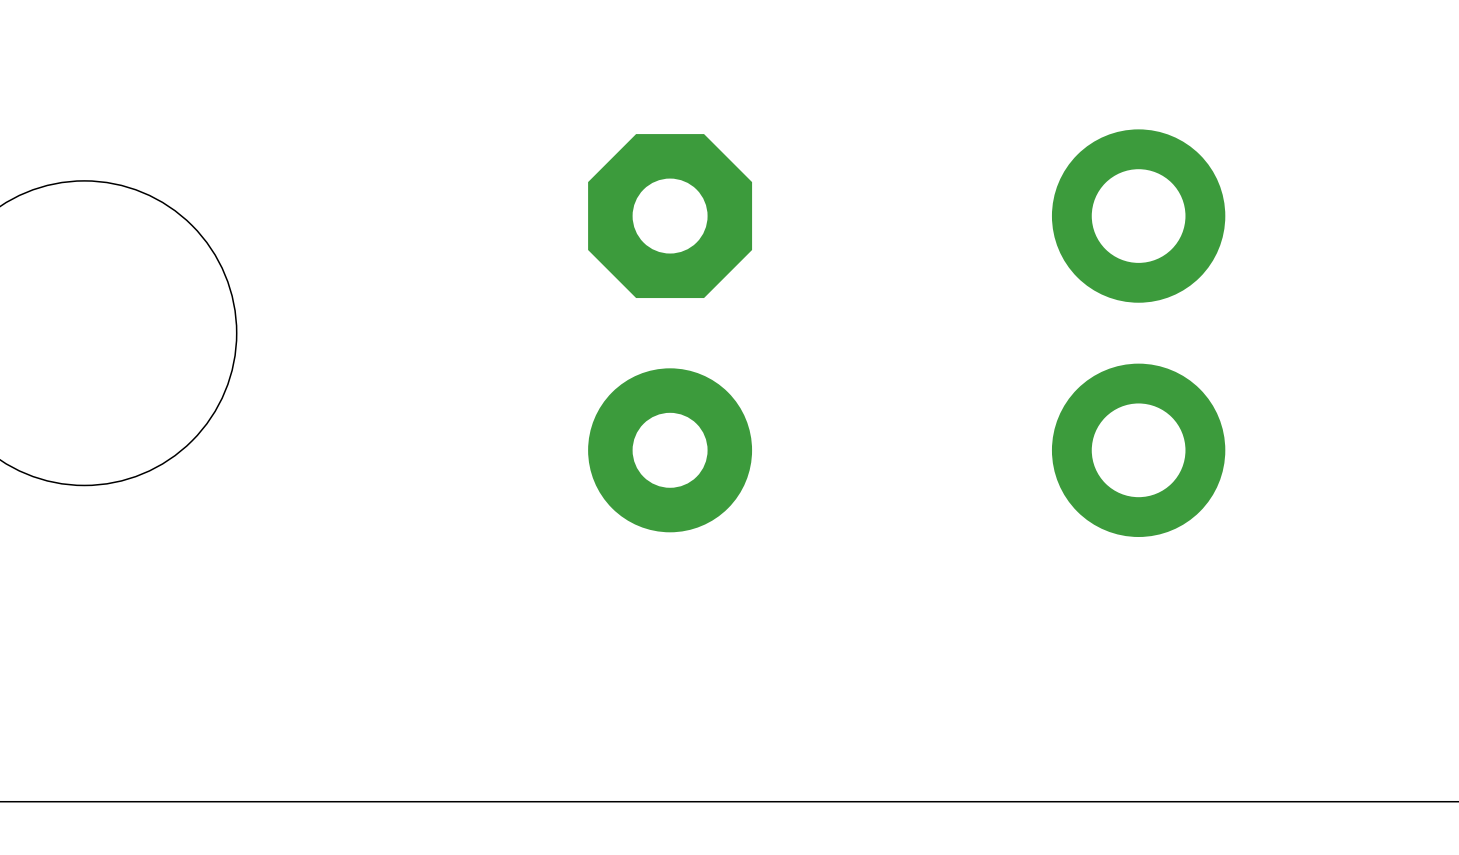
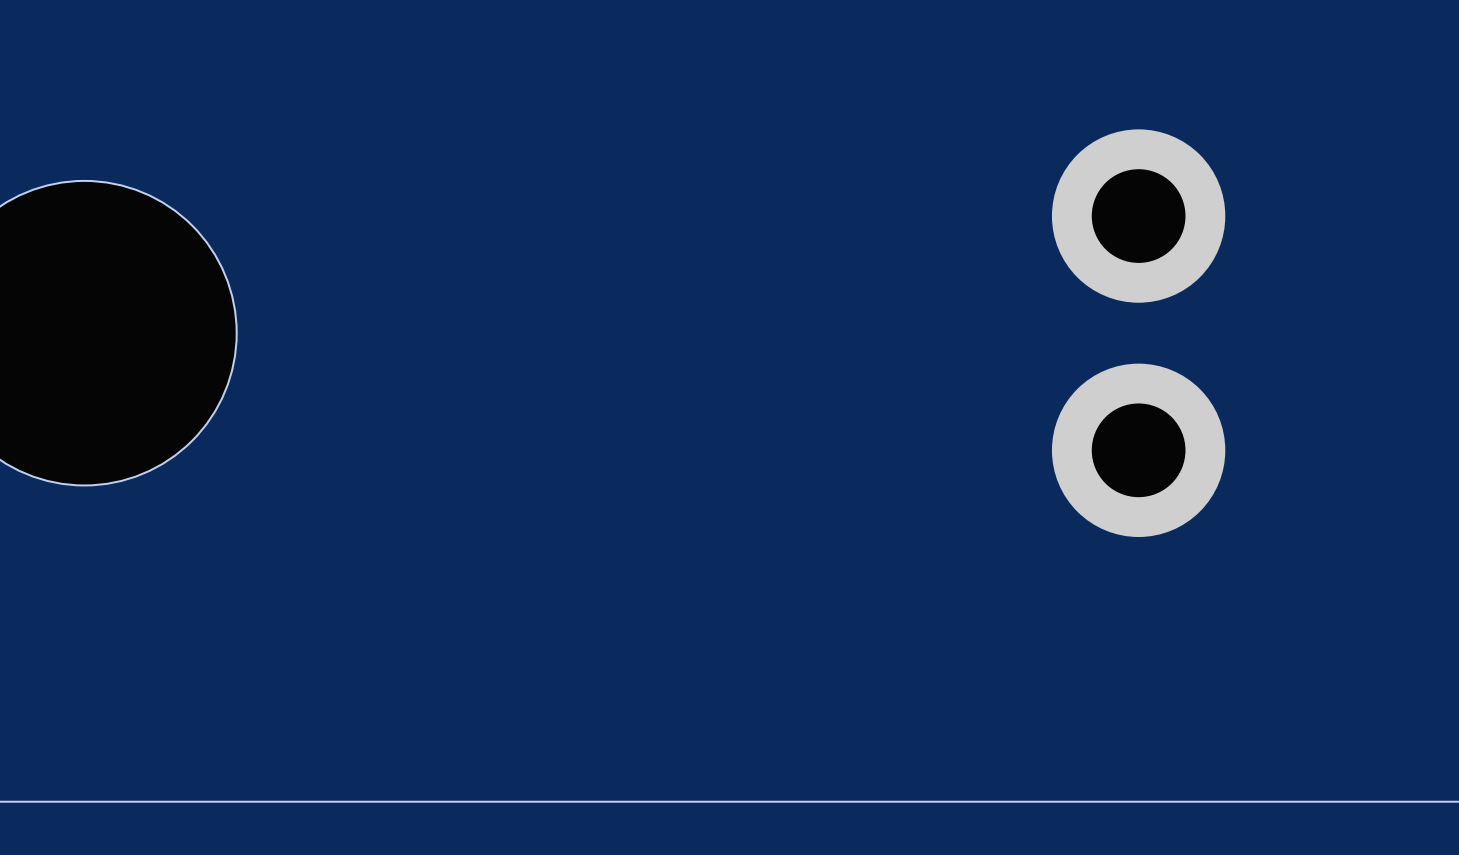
part: (670, 333) -> none

